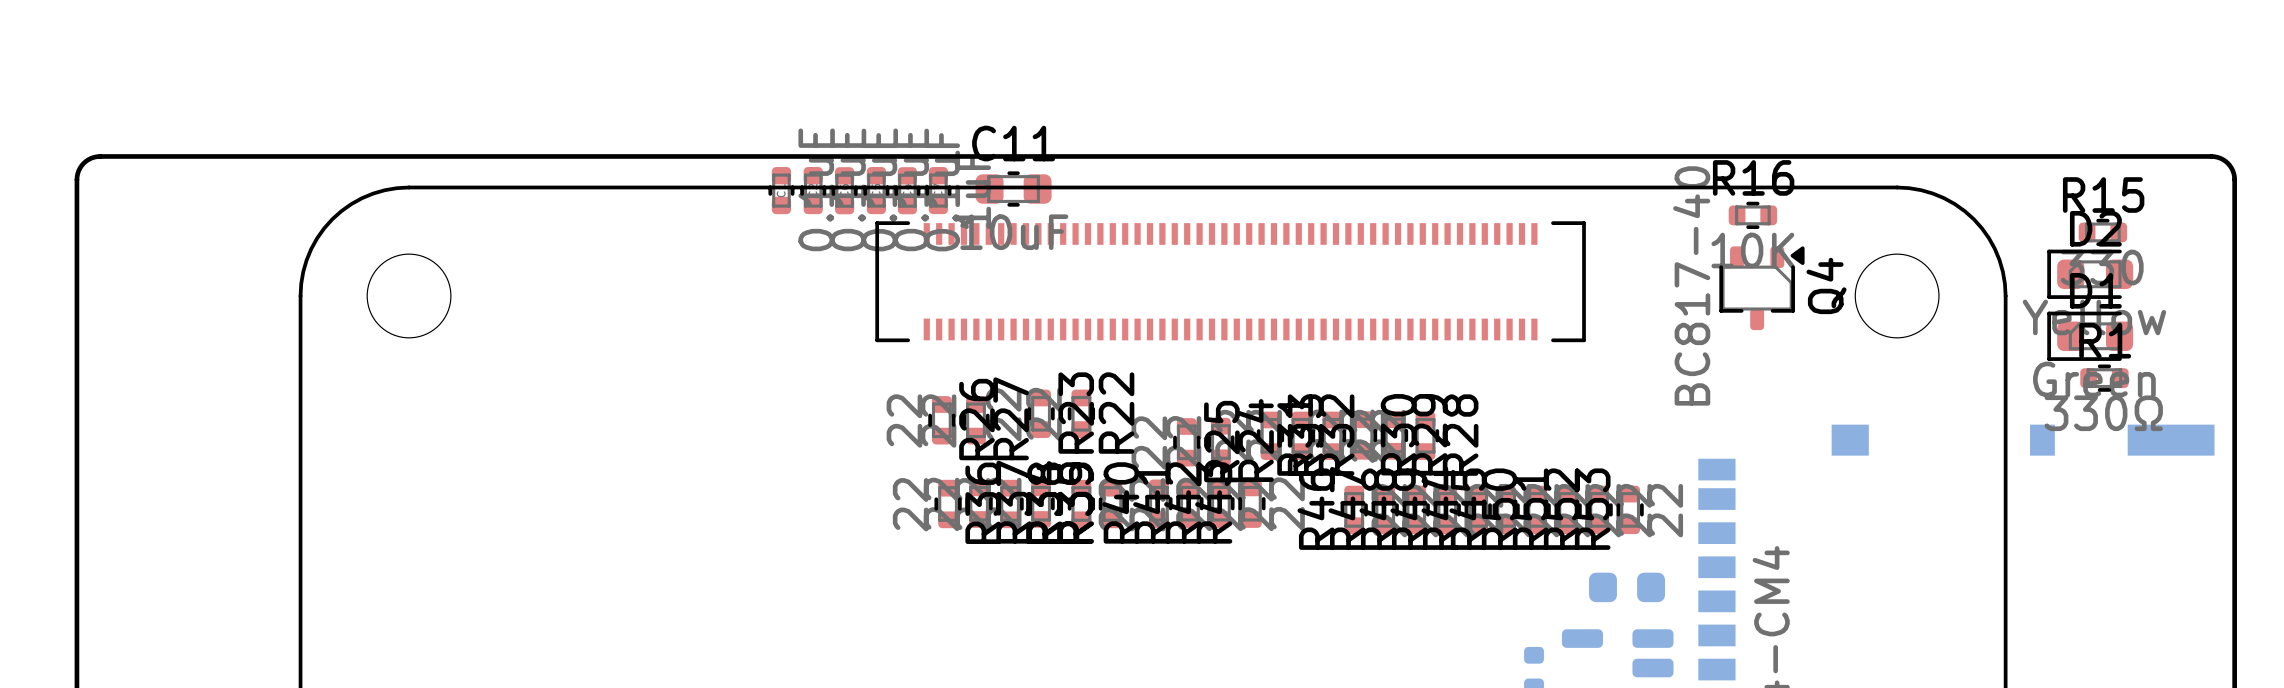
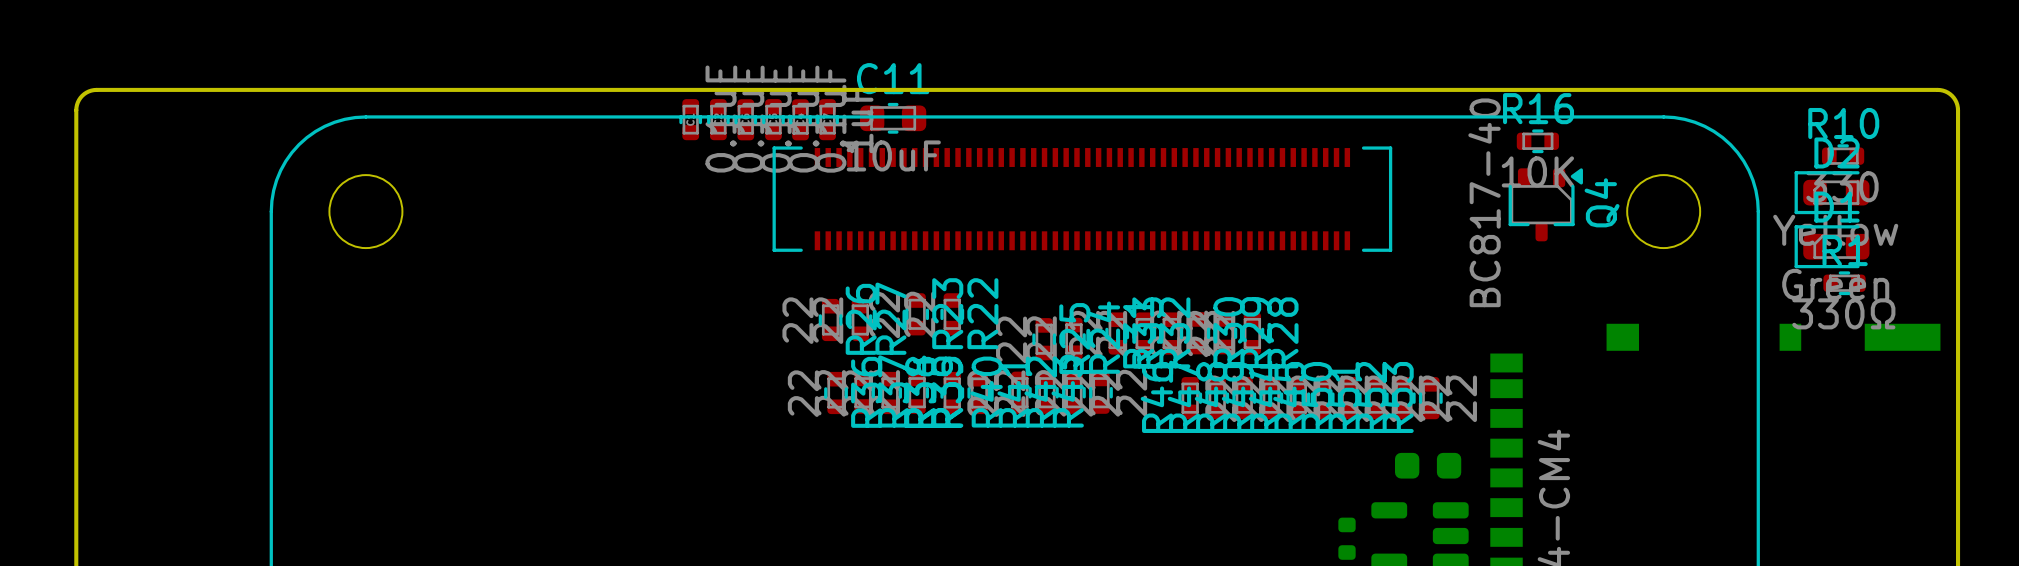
R15 name: R15 (2103, 195) -> R10 (1843, 123)

